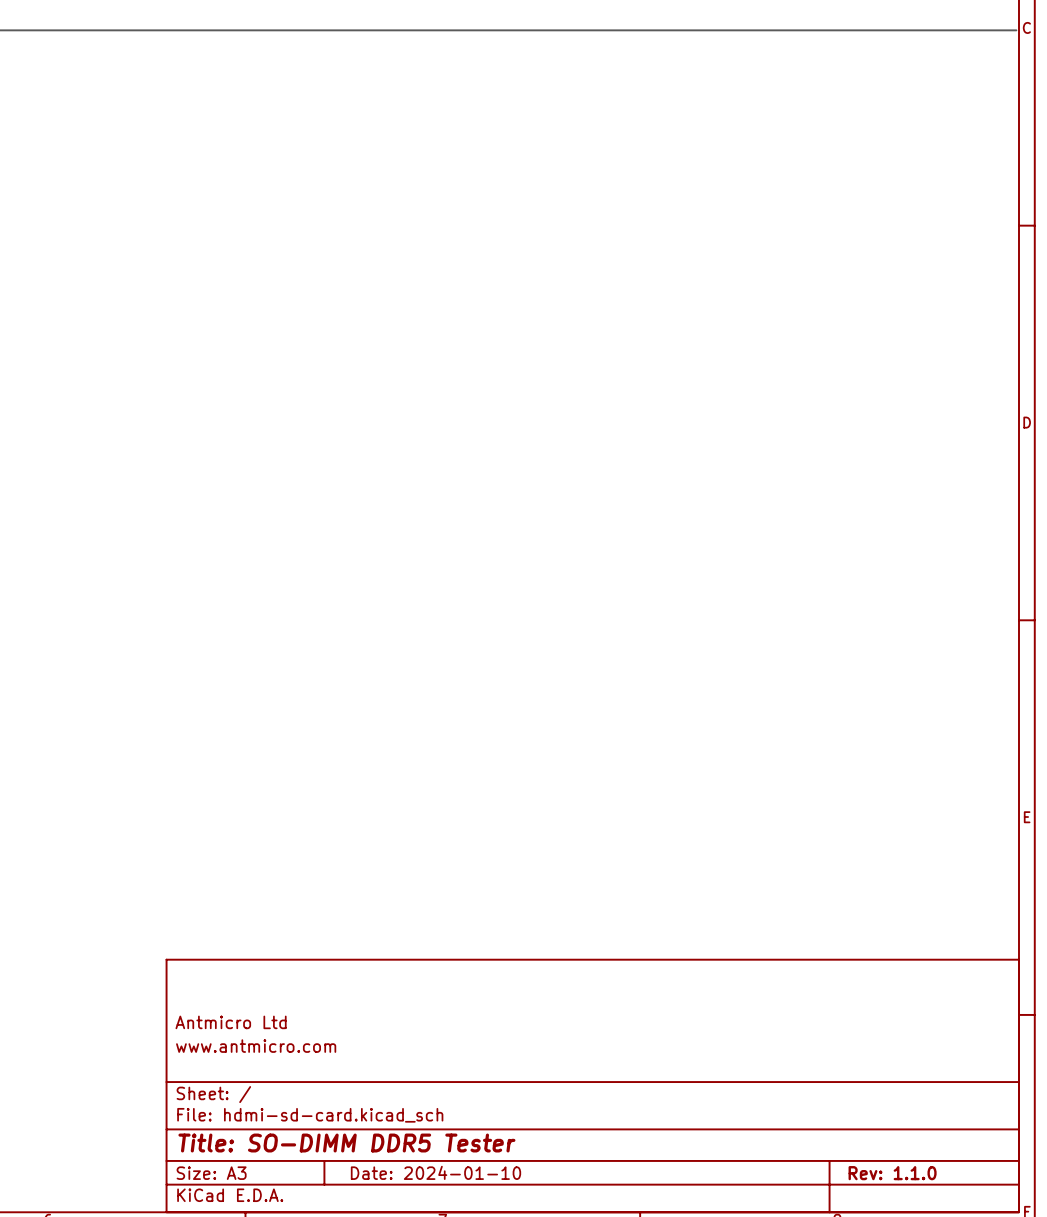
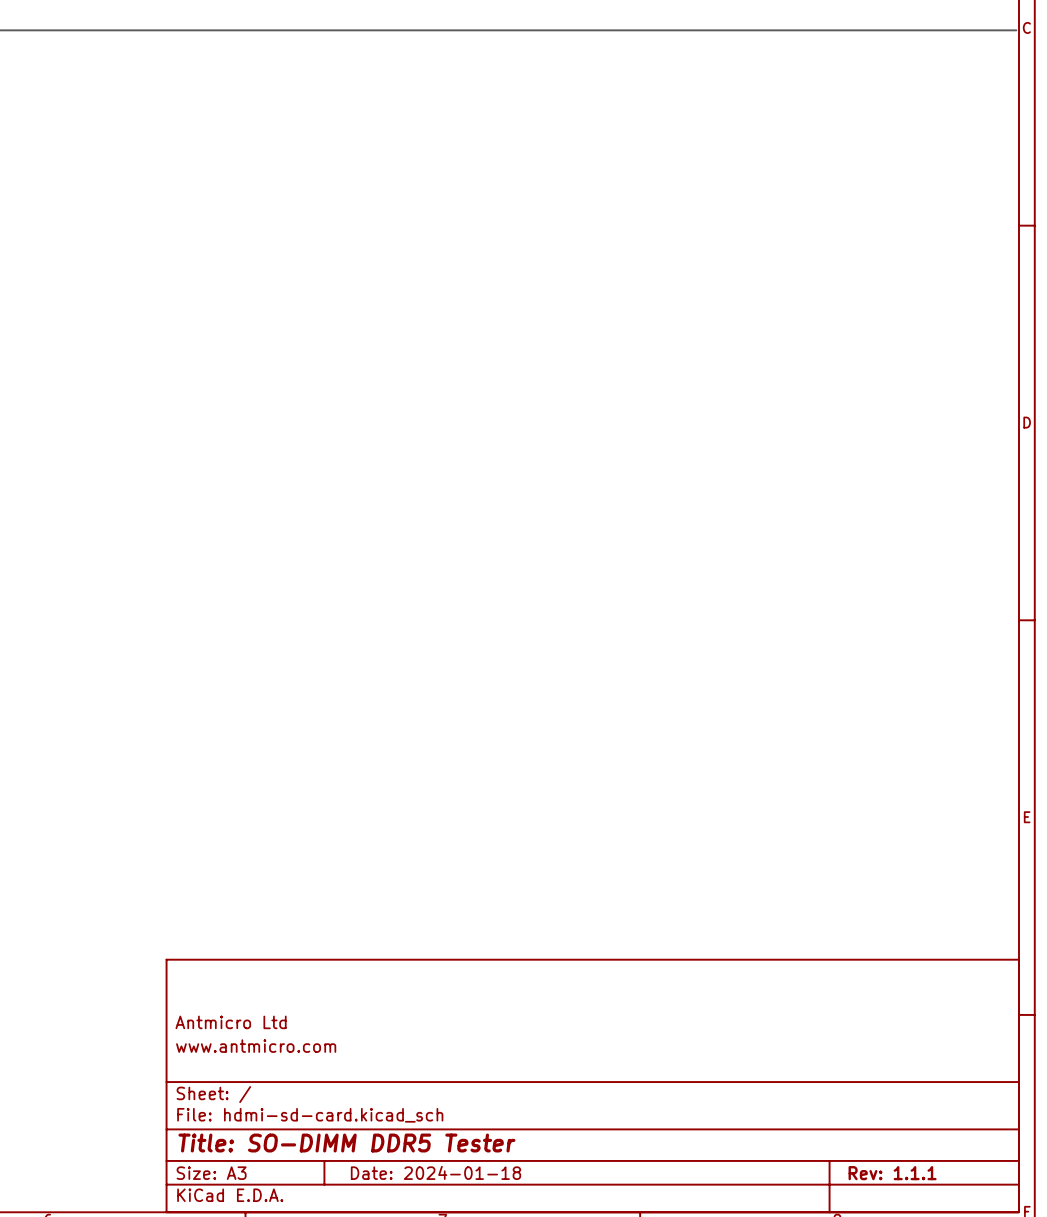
title block: Date: 2024-01-10 (435, 1172) -> Date: 2024-01-18 (435, 1172)
title block: Rev: 1.1.0 (892, 1173) -> Rev: 1.1.1 (892, 1173)

